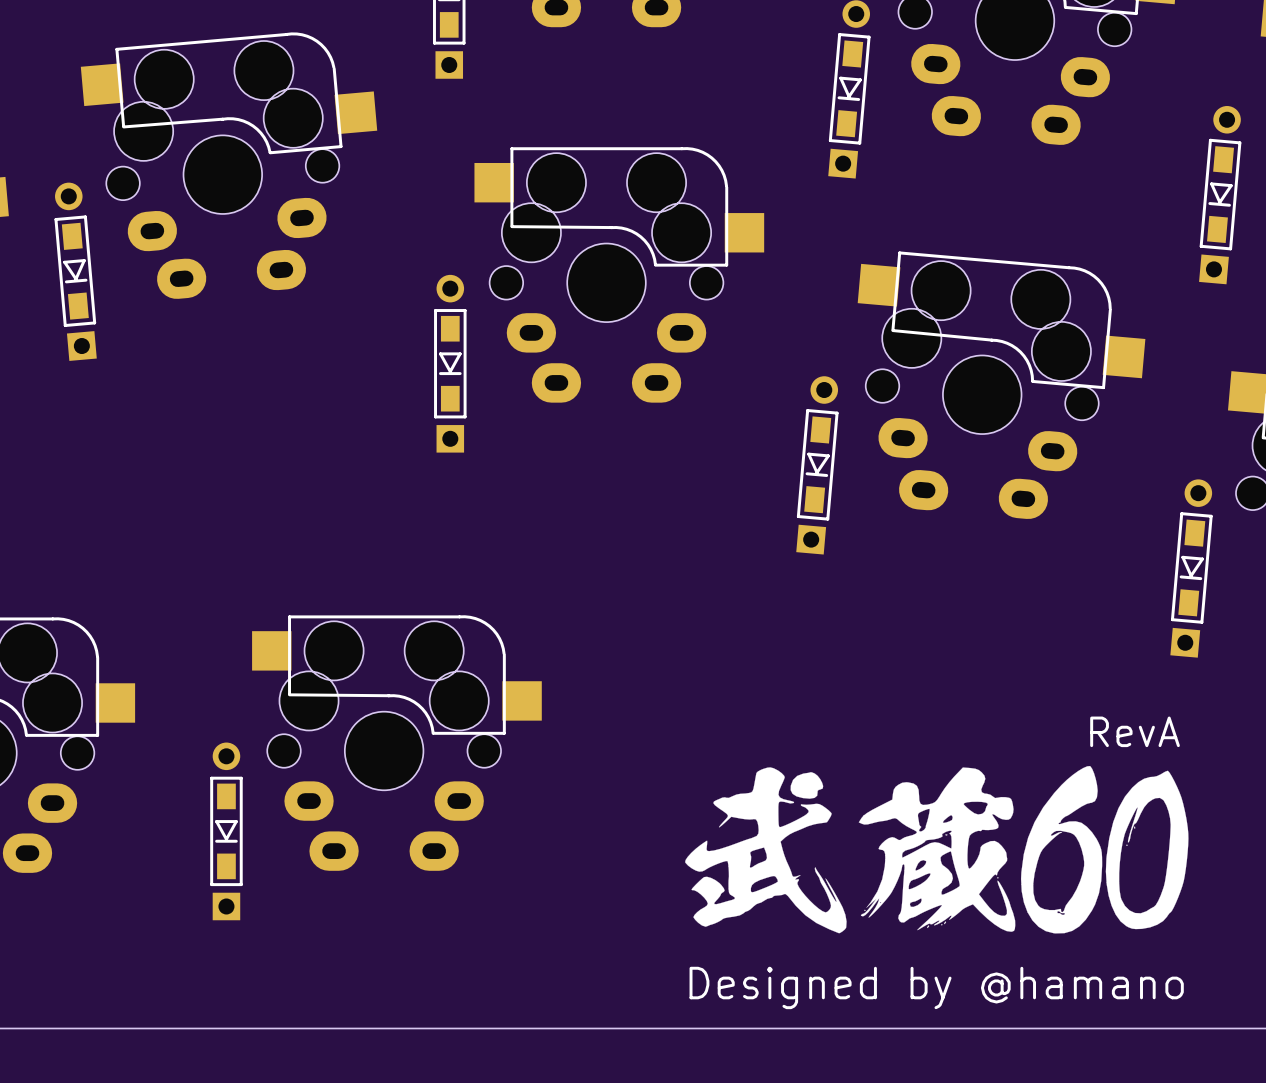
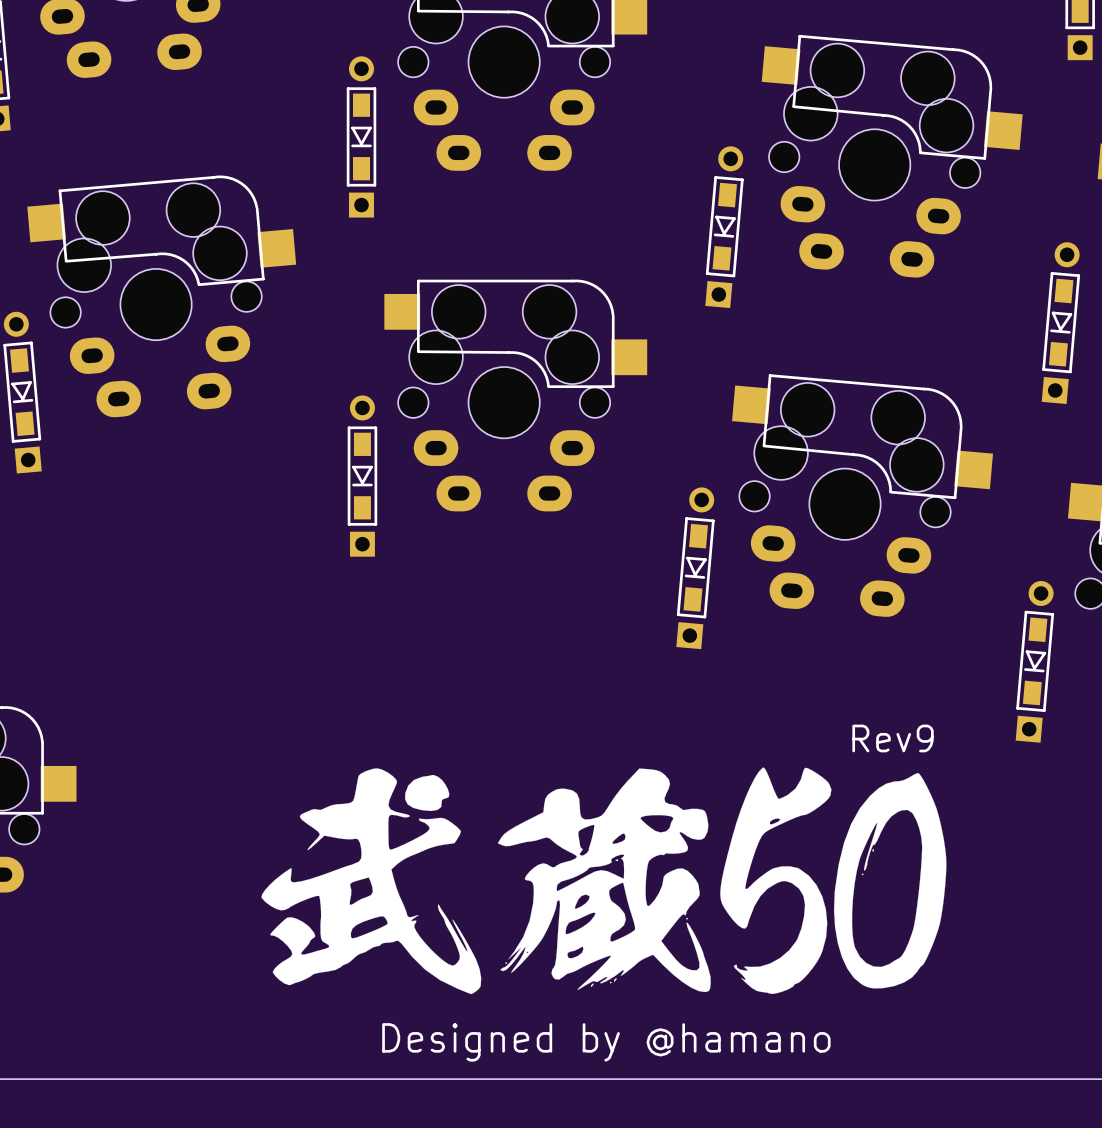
text: none -> Rev9 (893, 738)
drawing: none -> [261, 767, 947, 995]
text: RevA (1135, 731) -> none
part: (396, 743) -> none
drawing: [685, 765, 1189, 934] -> none
part: (226, 831) -> none
text position: Designed by @hamano (936, 987) -> Designed by @hamano (606, 1042)

